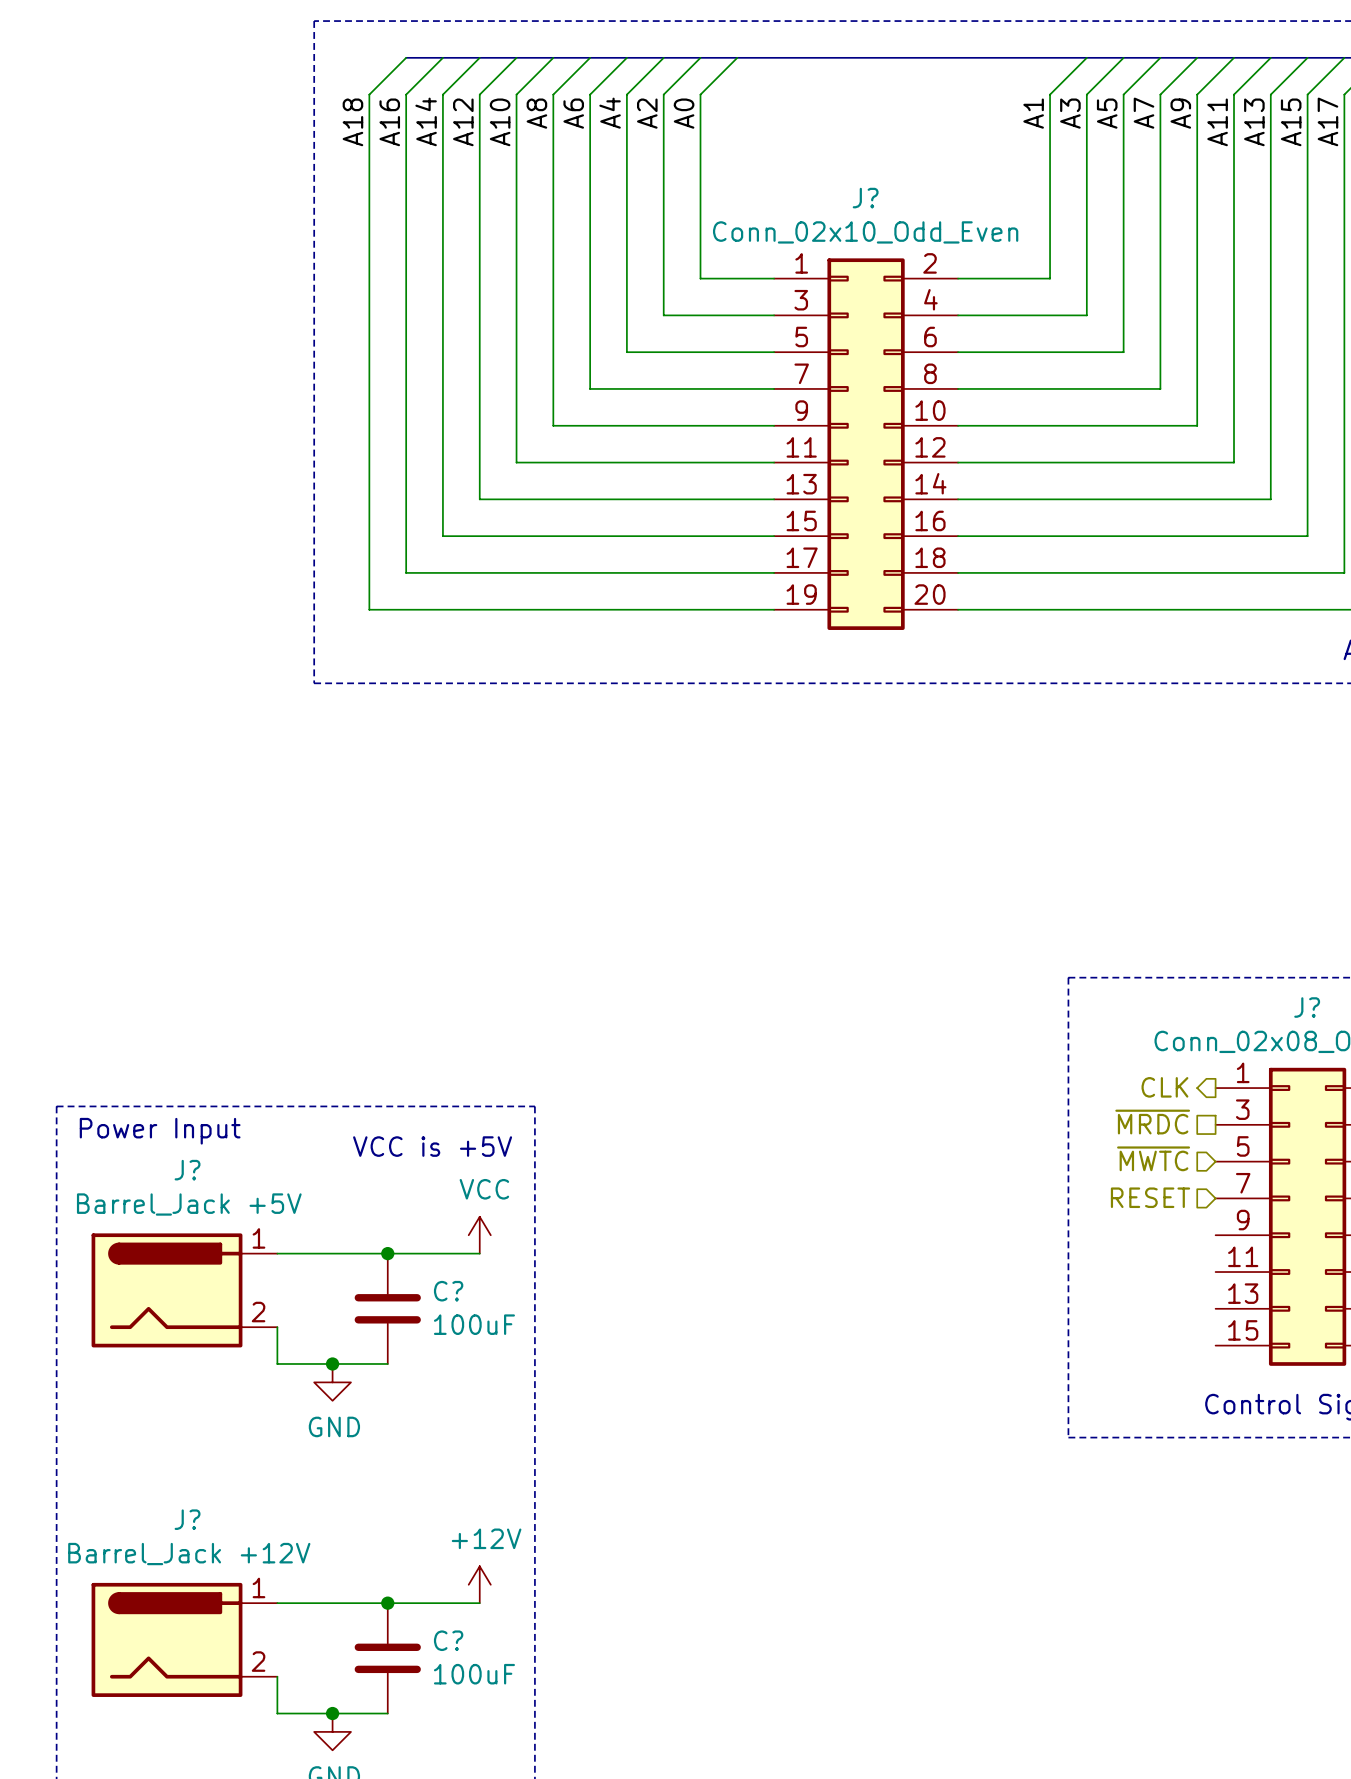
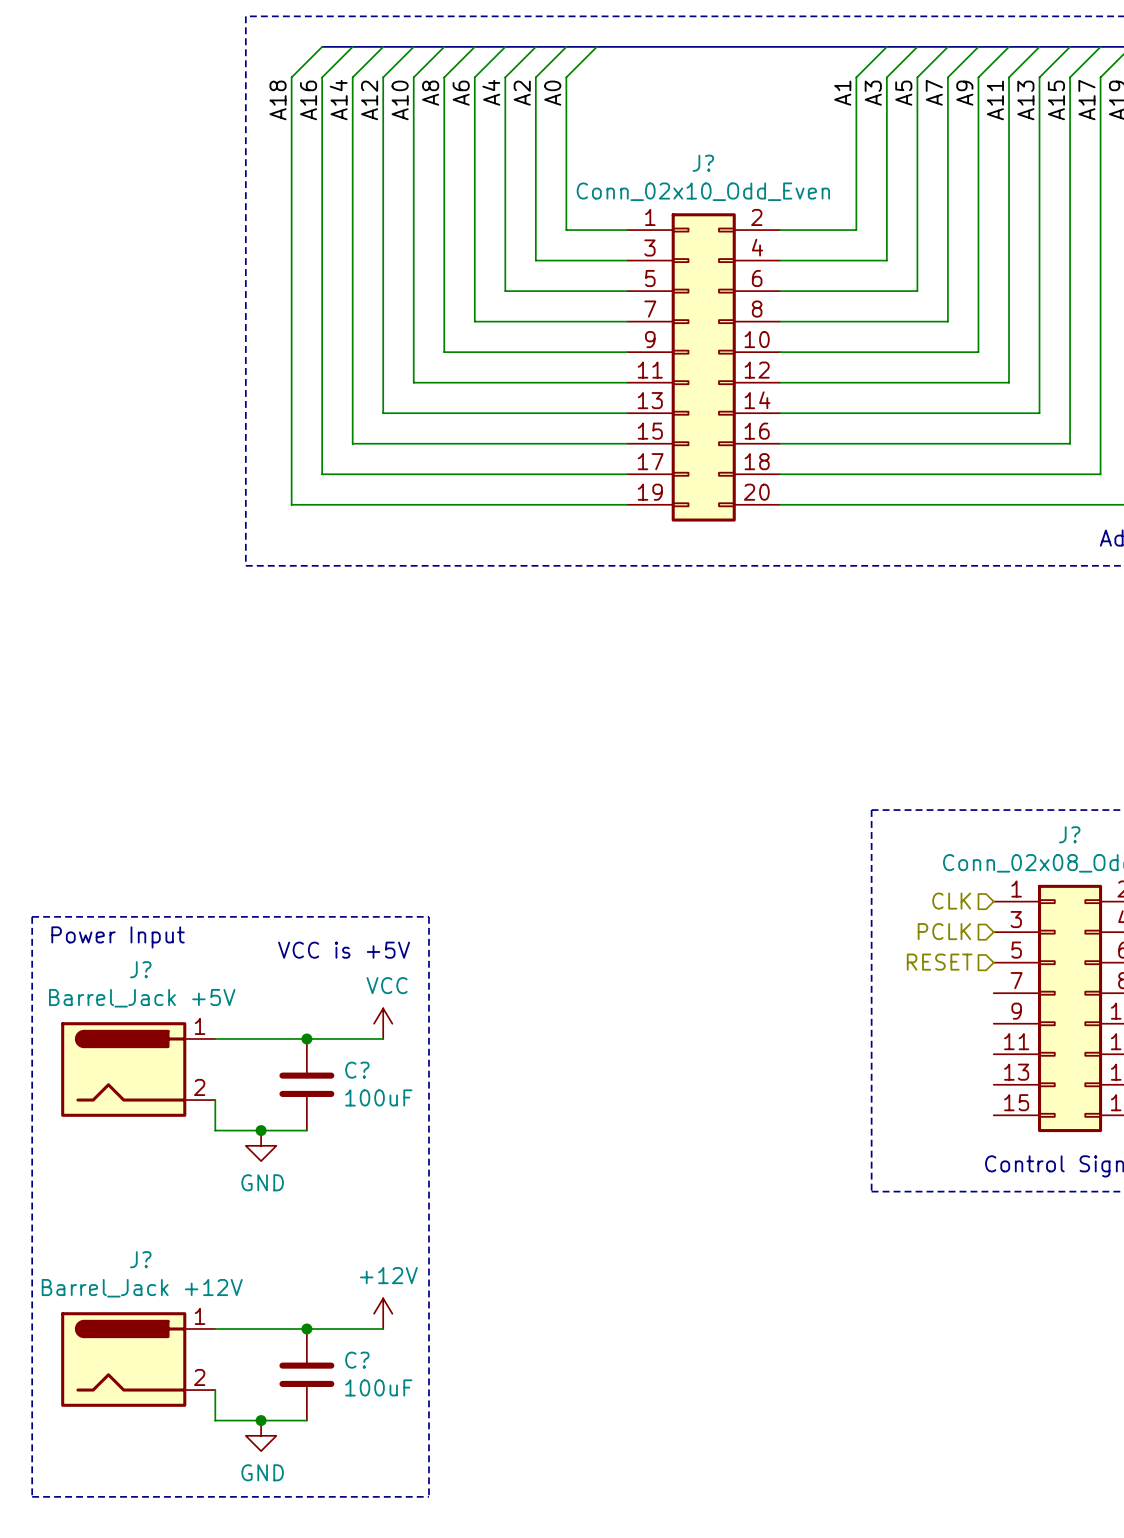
hierarchical label shape: output (1164, 1087) -> input (951, 901)
hierarchical label shape: passive (1152, 1122) -> input (944, 931)
hierarchical label: ~{MRDC} (1152, 1122) -> PCLK (944, 931)
hierarchical label: ~{MWTC} (1153, 1158) -> RESET (939, 962)
hierarchical label: RESET (1150, 1197) -> none

